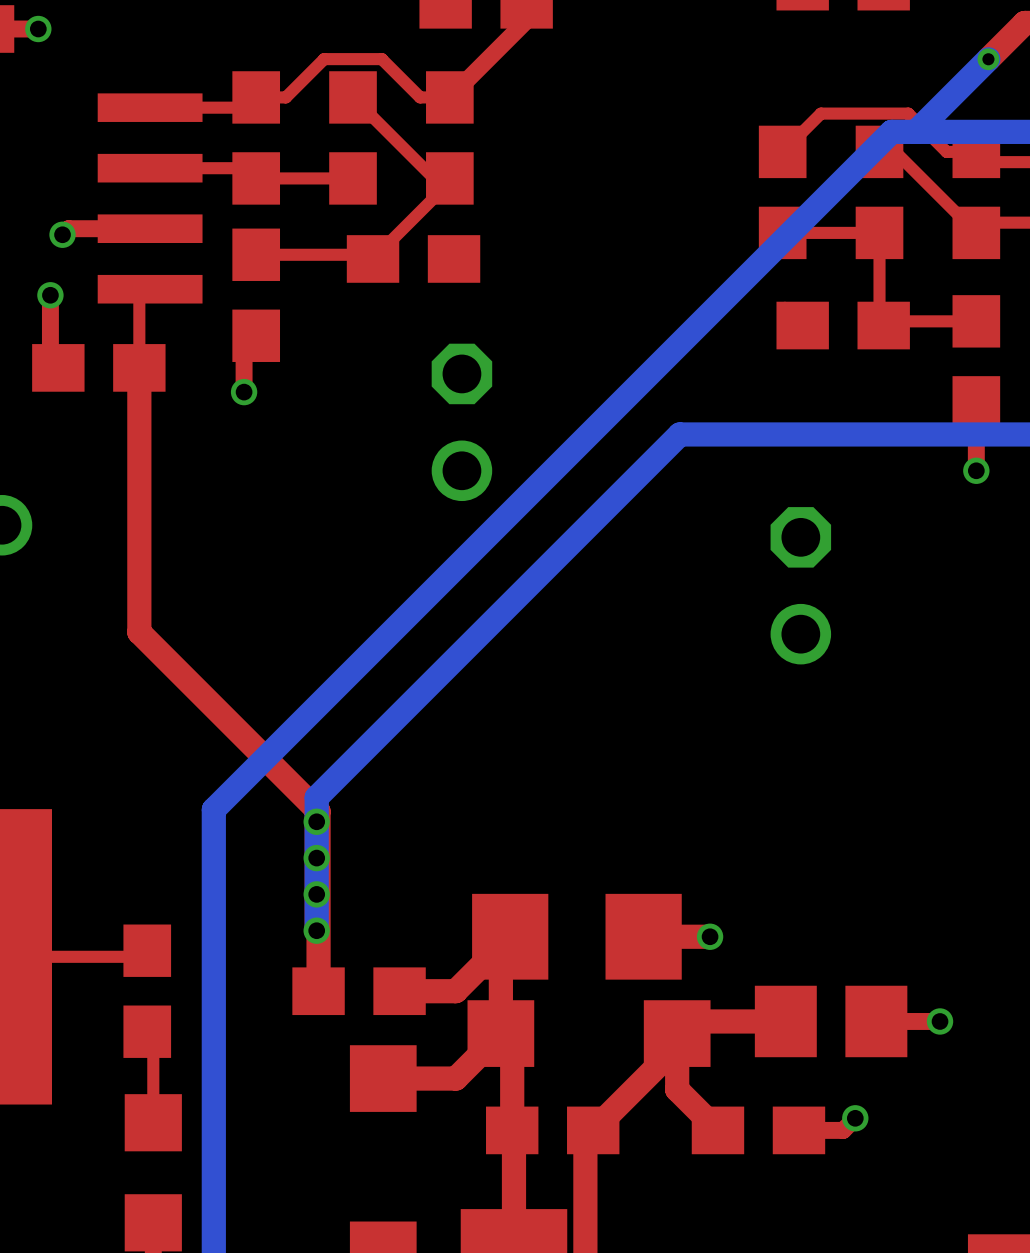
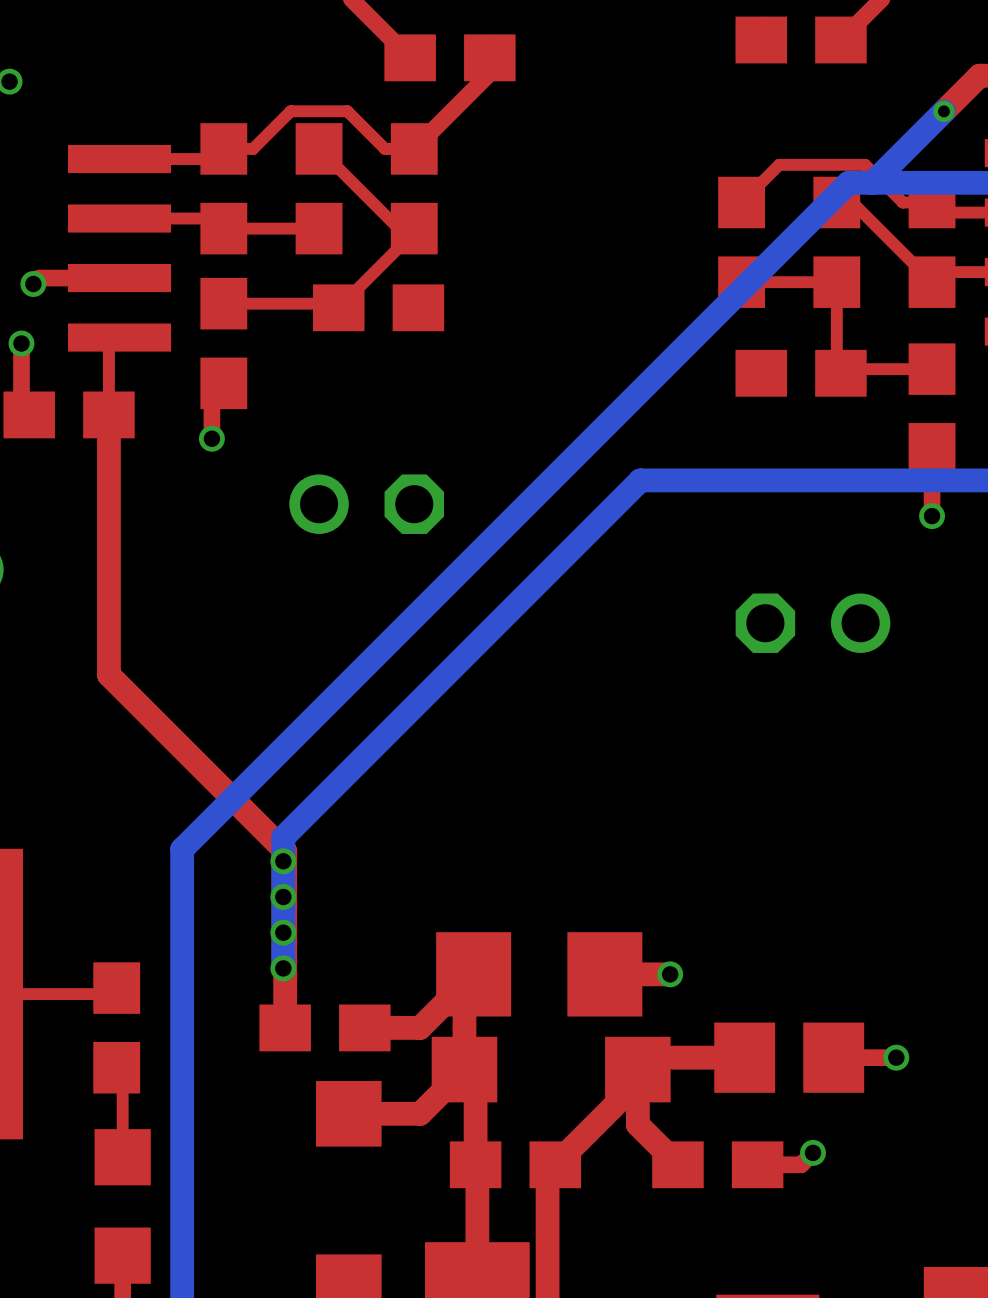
part rotation: 0° (461, 422) -> 90° clockwise (366, 504)
part rotation: 0° (800, 585) -> 90° counterclockwise (813, 623)

